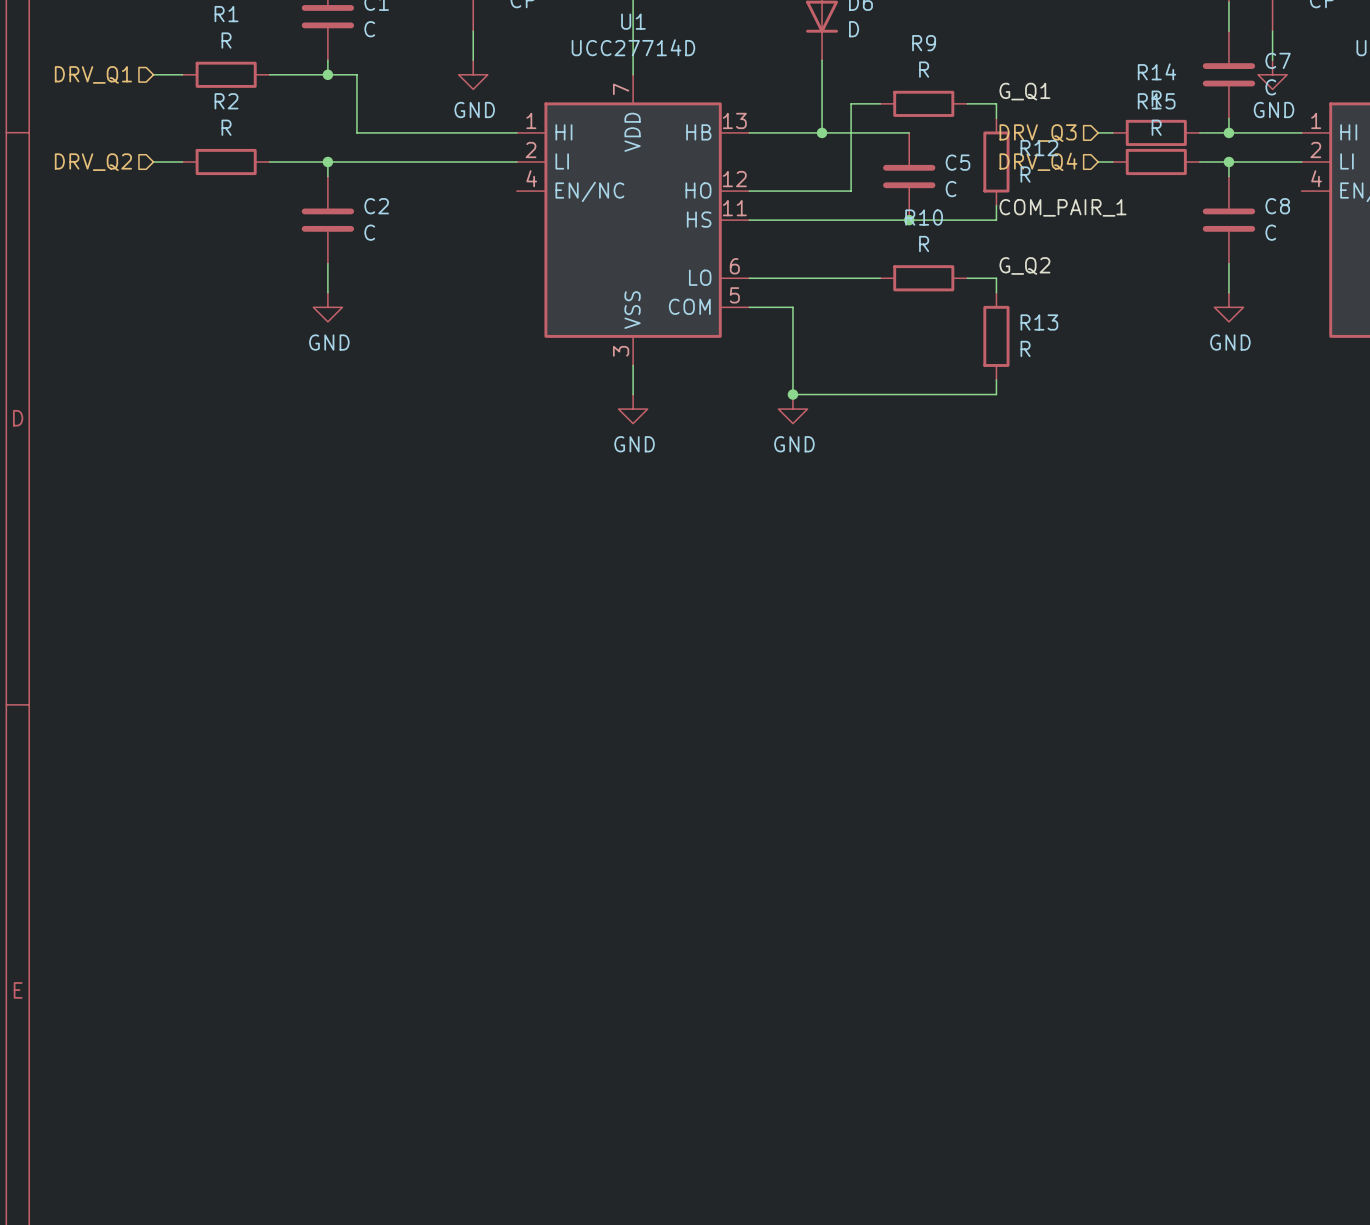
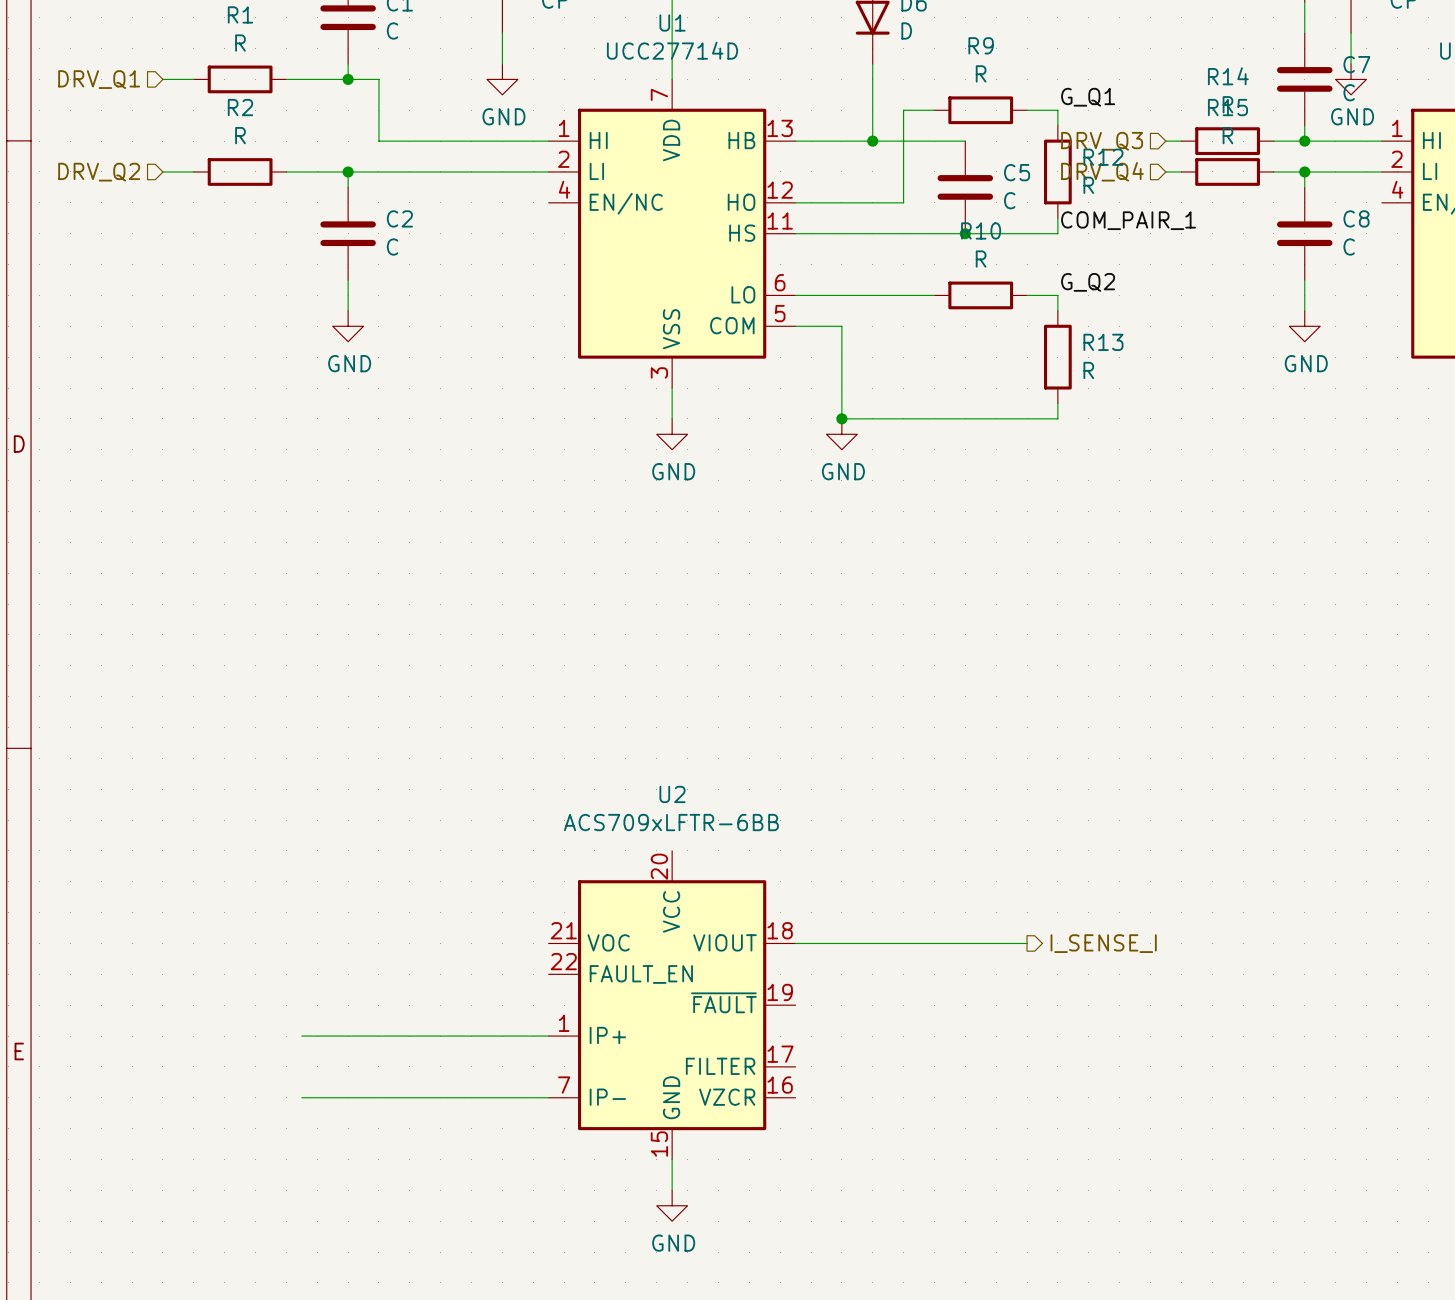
wire: none -> (795, 943) (1027, 943)
hierarchical label: none -> I_SENSE_I (1103, 943)
U2: none -> ACS709xLFTR-6BB (672, 1005)
wire: none -> (301, 1036) (548, 1036)
wire: none -> (301, 1097) (548, 1097)
wire: none -> (672, 1159) (672, 1190)
power symbol: none -> GND (672, 1205)

